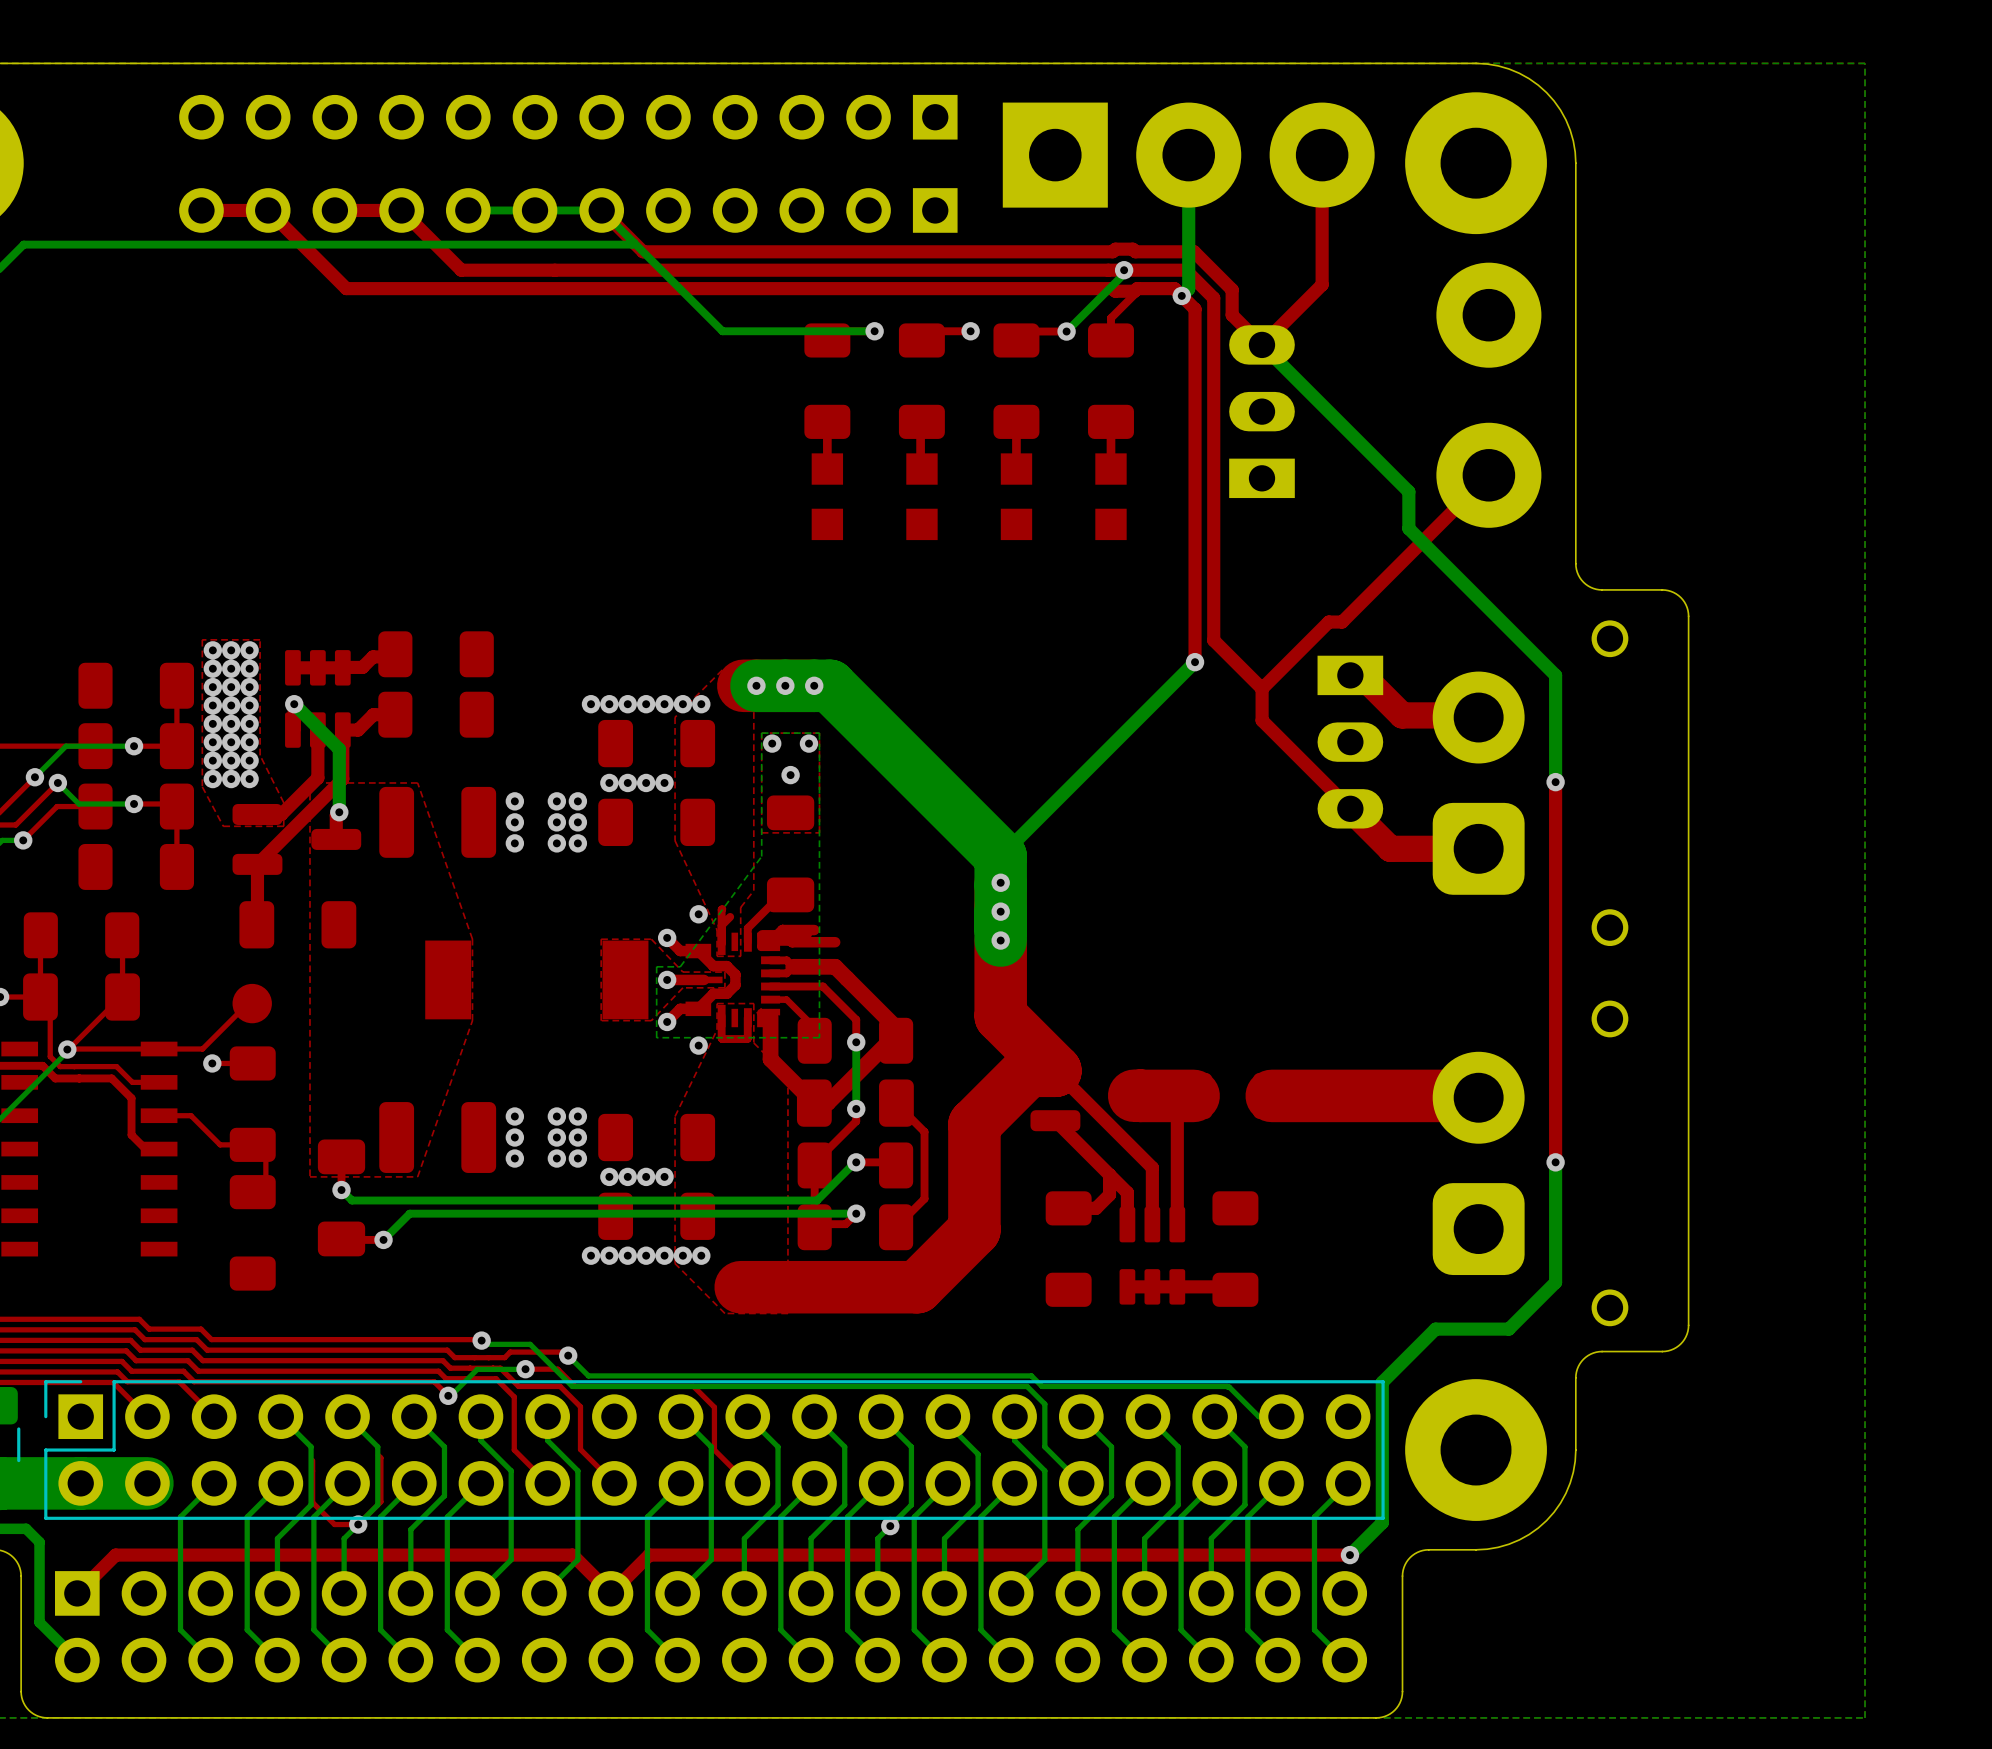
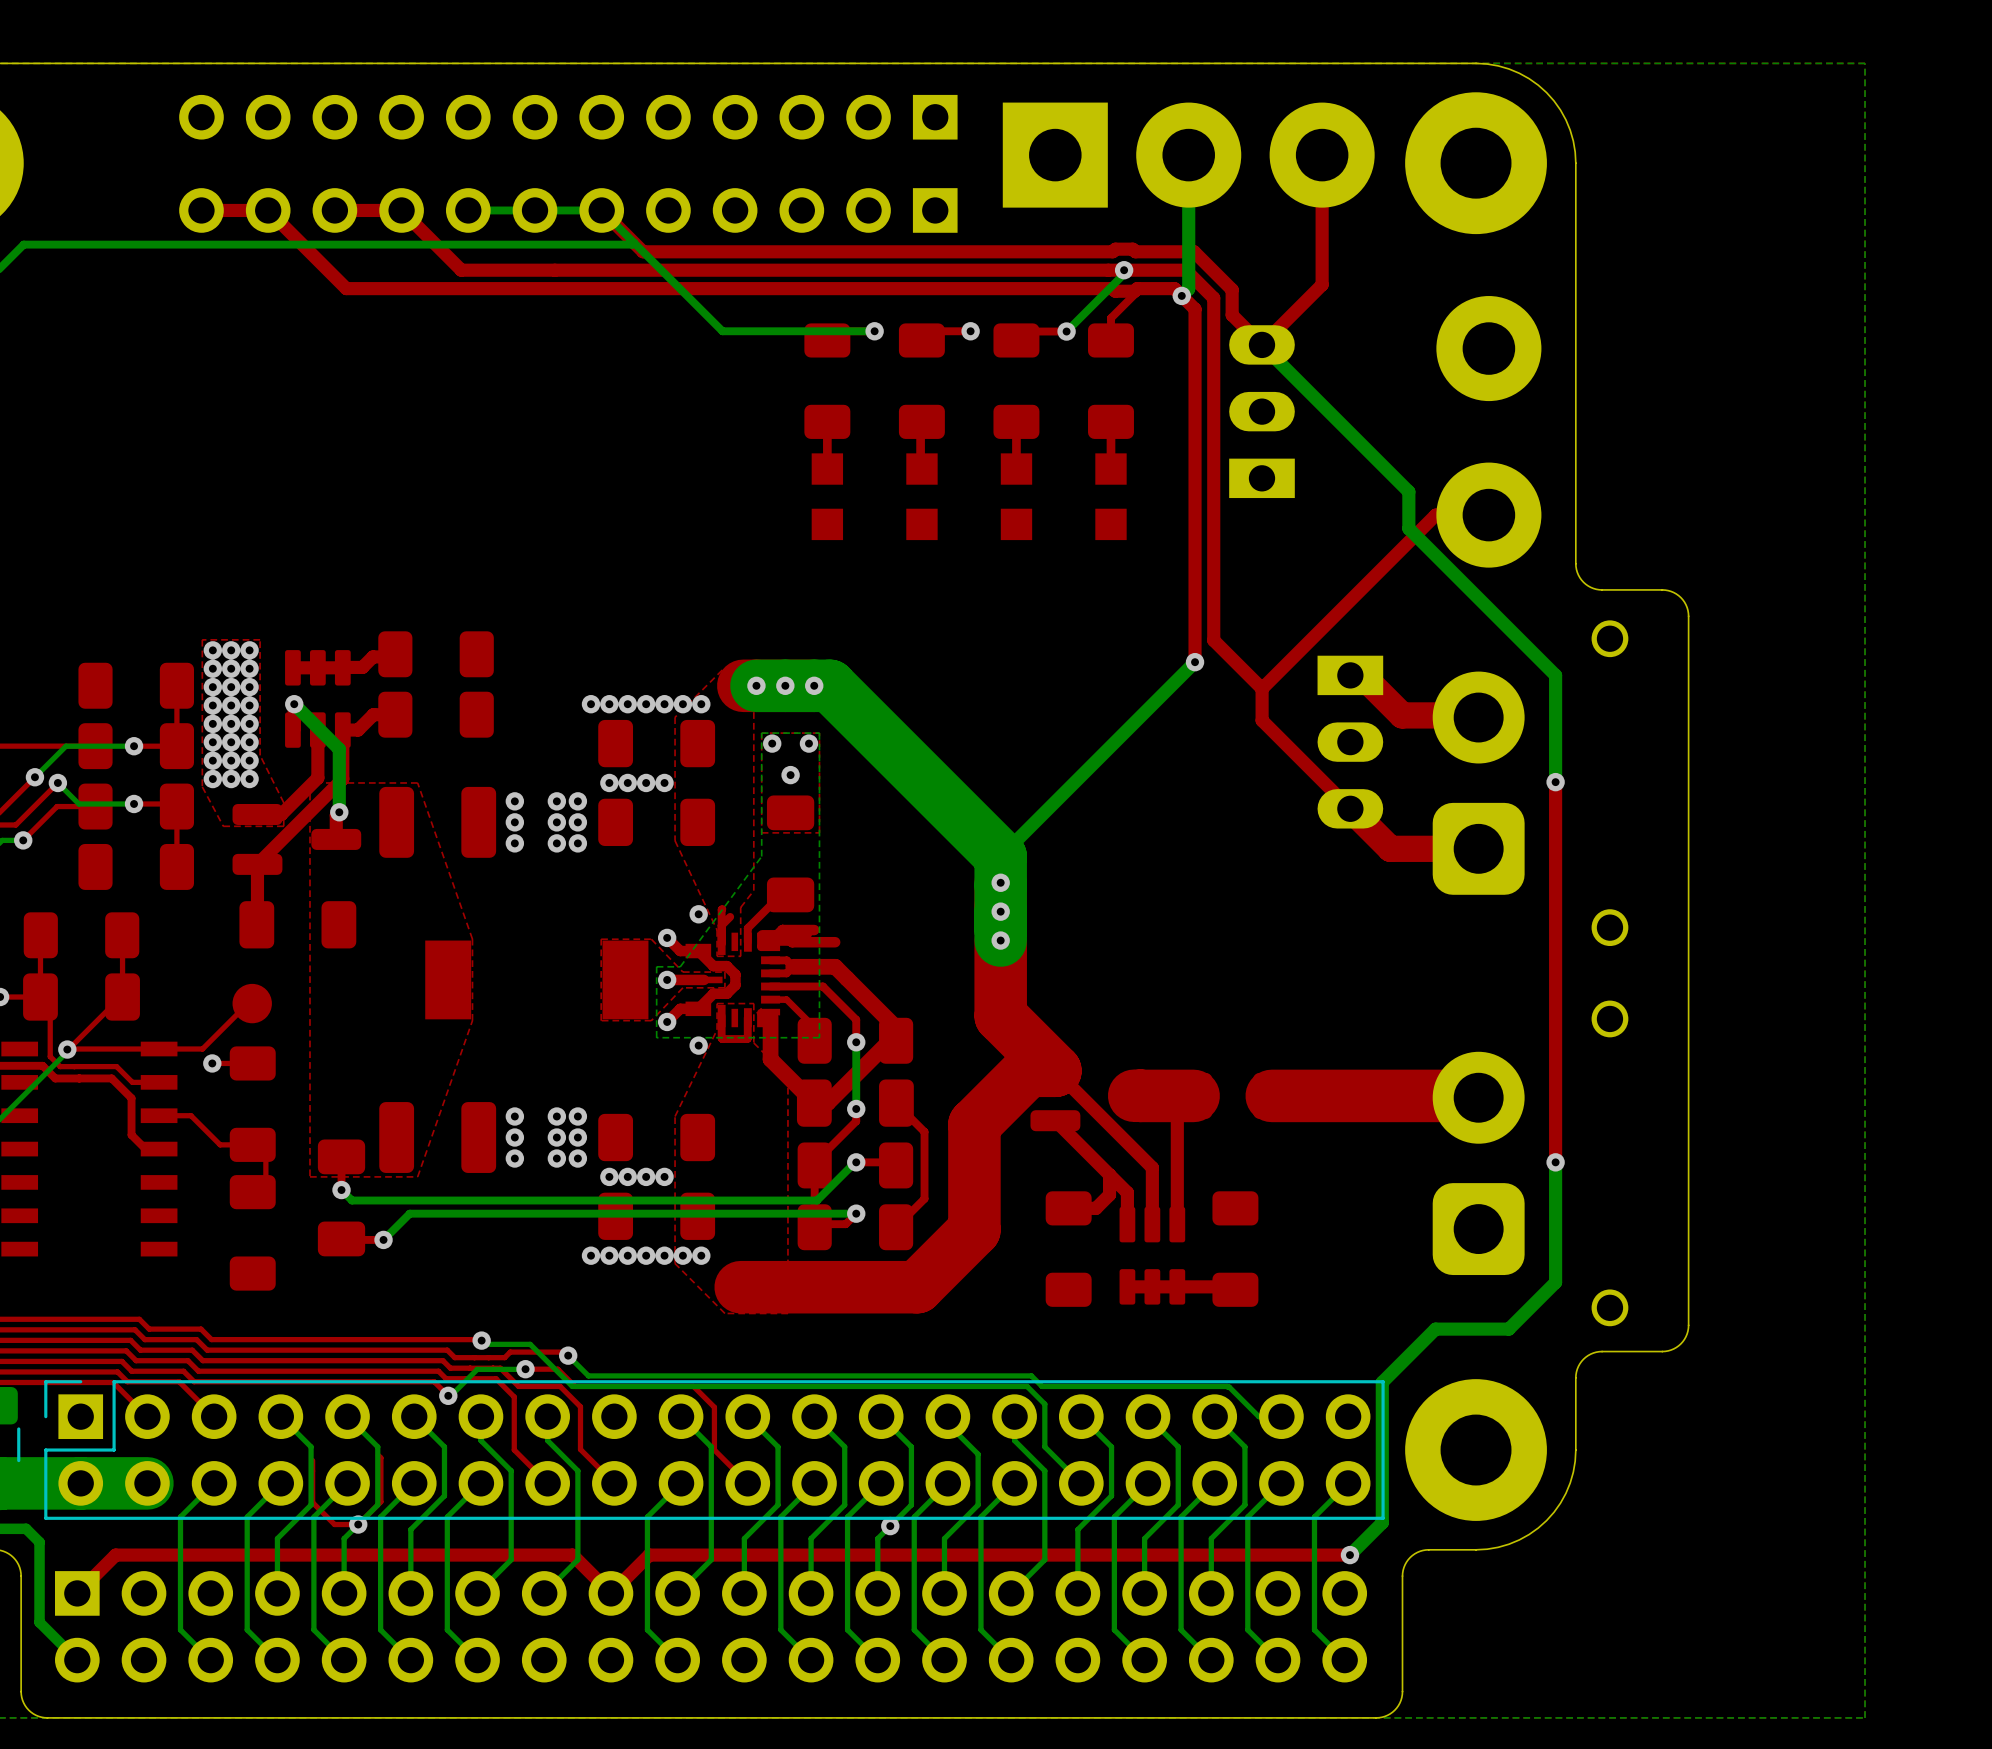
part position: (1488, 315) -> (1488, 348)
top track: (1488, 475) (1342, 622) (1328, 622) -> (1488, 515) (1435, 515) (1328, 622)
part position: (1488, 475) -> (1488, 515)

